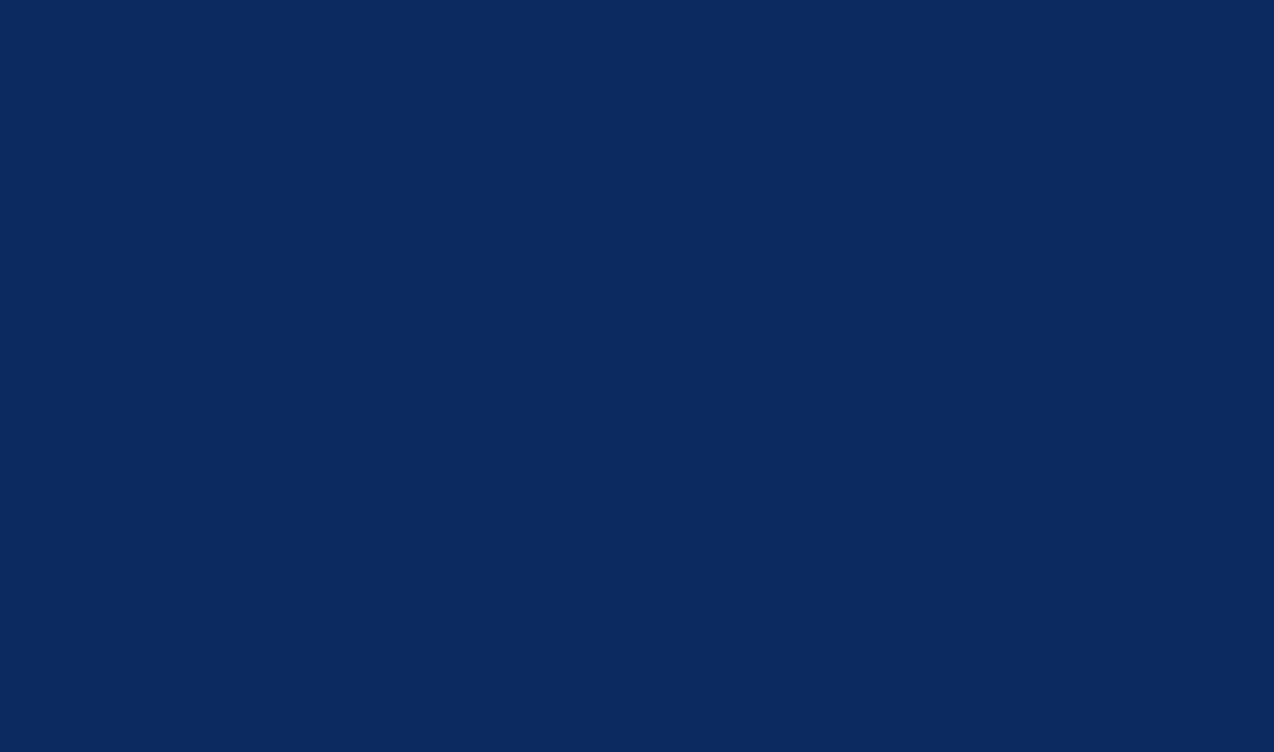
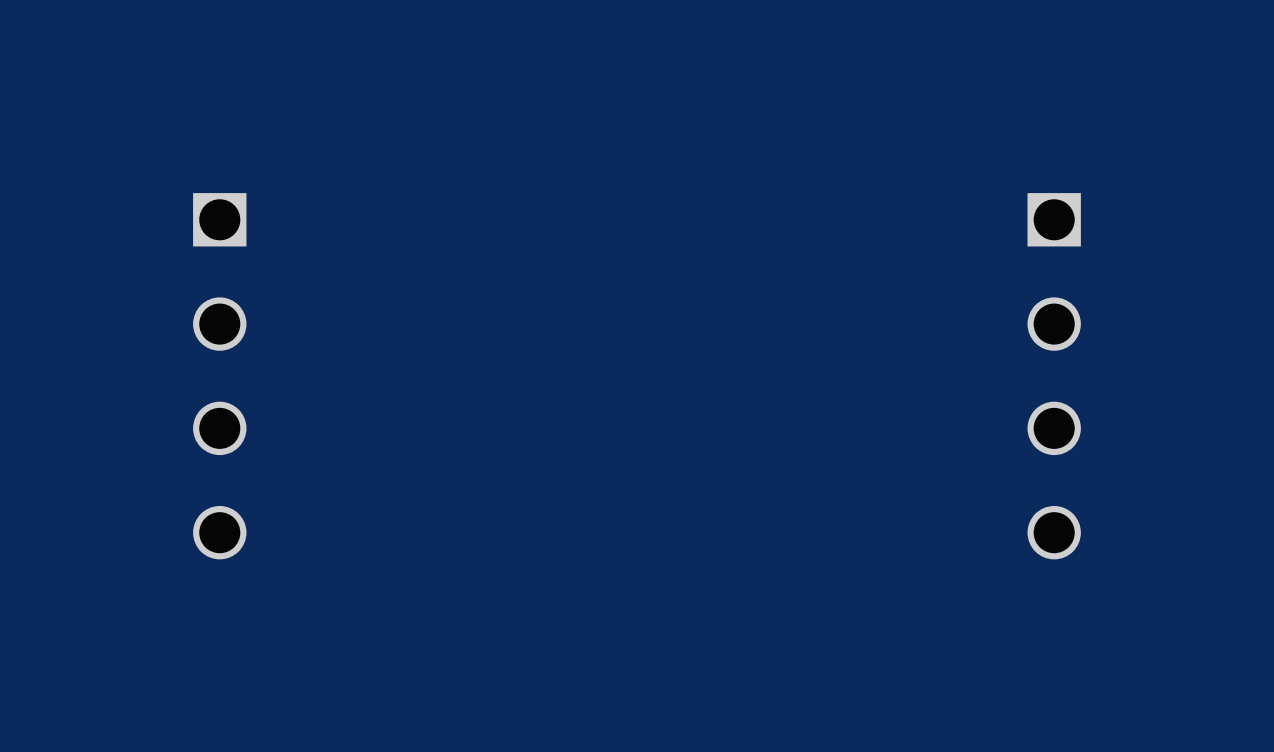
part: none -> (219, 376)
part: none -> (1054, 376)

